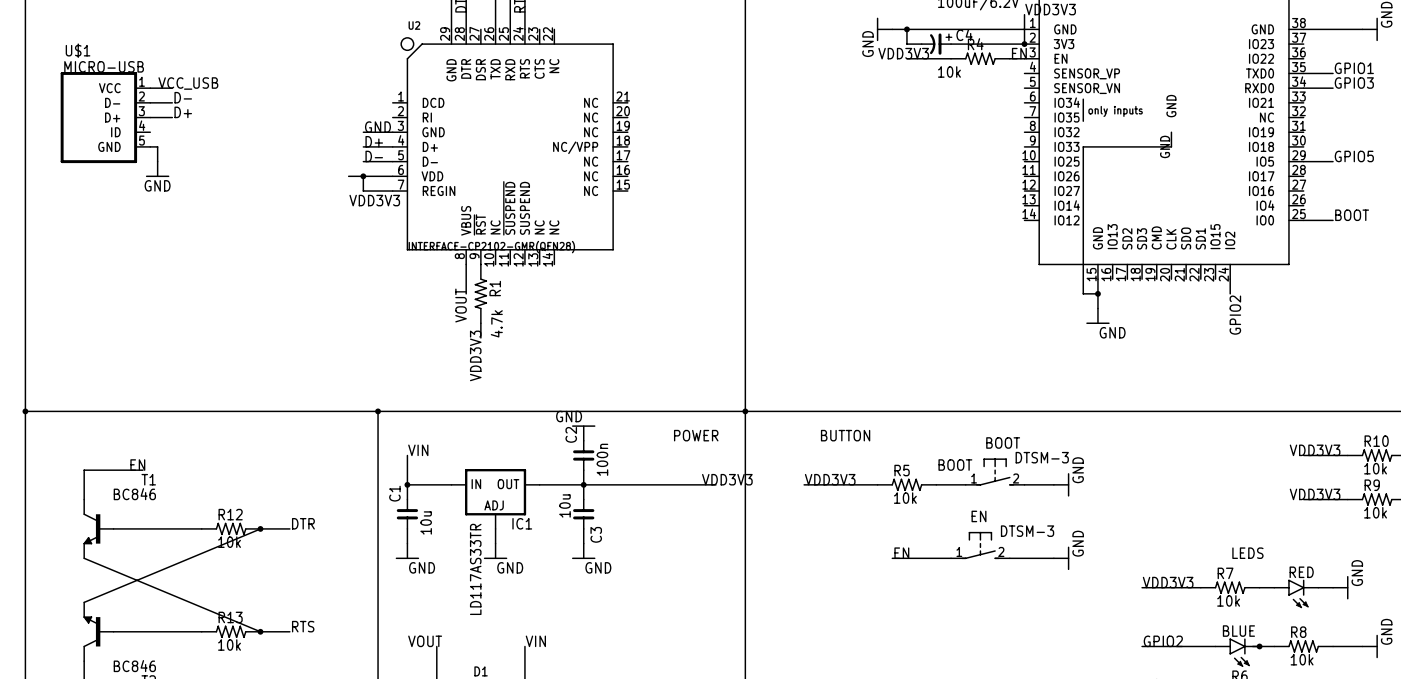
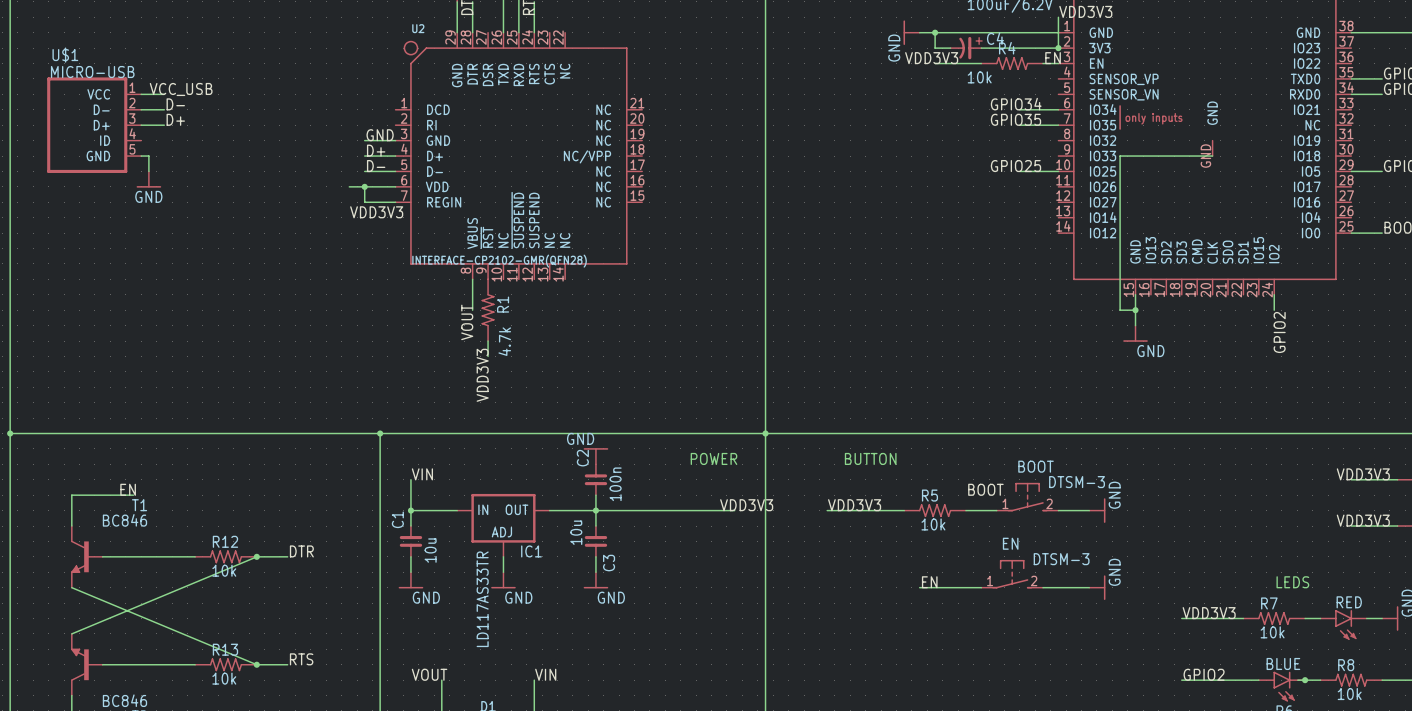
label: none -> GPIO34 (1016, 104)
wire: none -> (1019, 109) (1058, 109)
label: none -> GPIO35 (1015, 119)
wire: none -> (1019, 125) (1058, 125)
label: none -> GPIO25 (1015, 166)
wire: none -> (1019, 171) (1058, 171)

